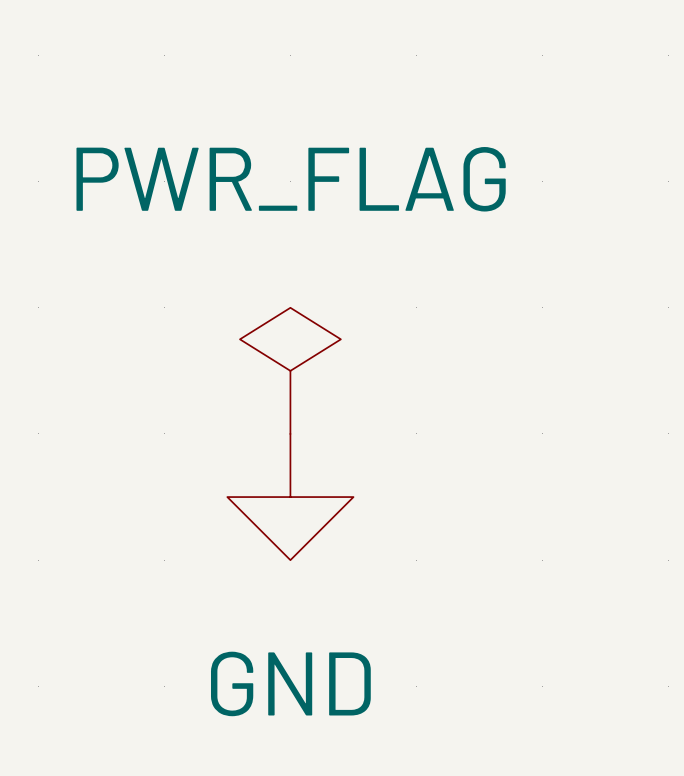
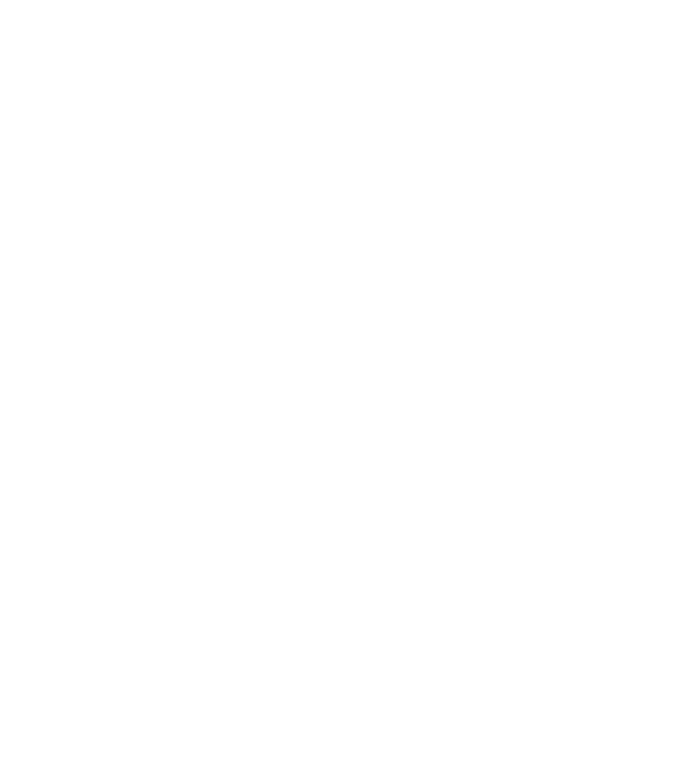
power symbol: PWR_FLAG (290, 370) -> none
power symbol: GND (290, 497) -> none

